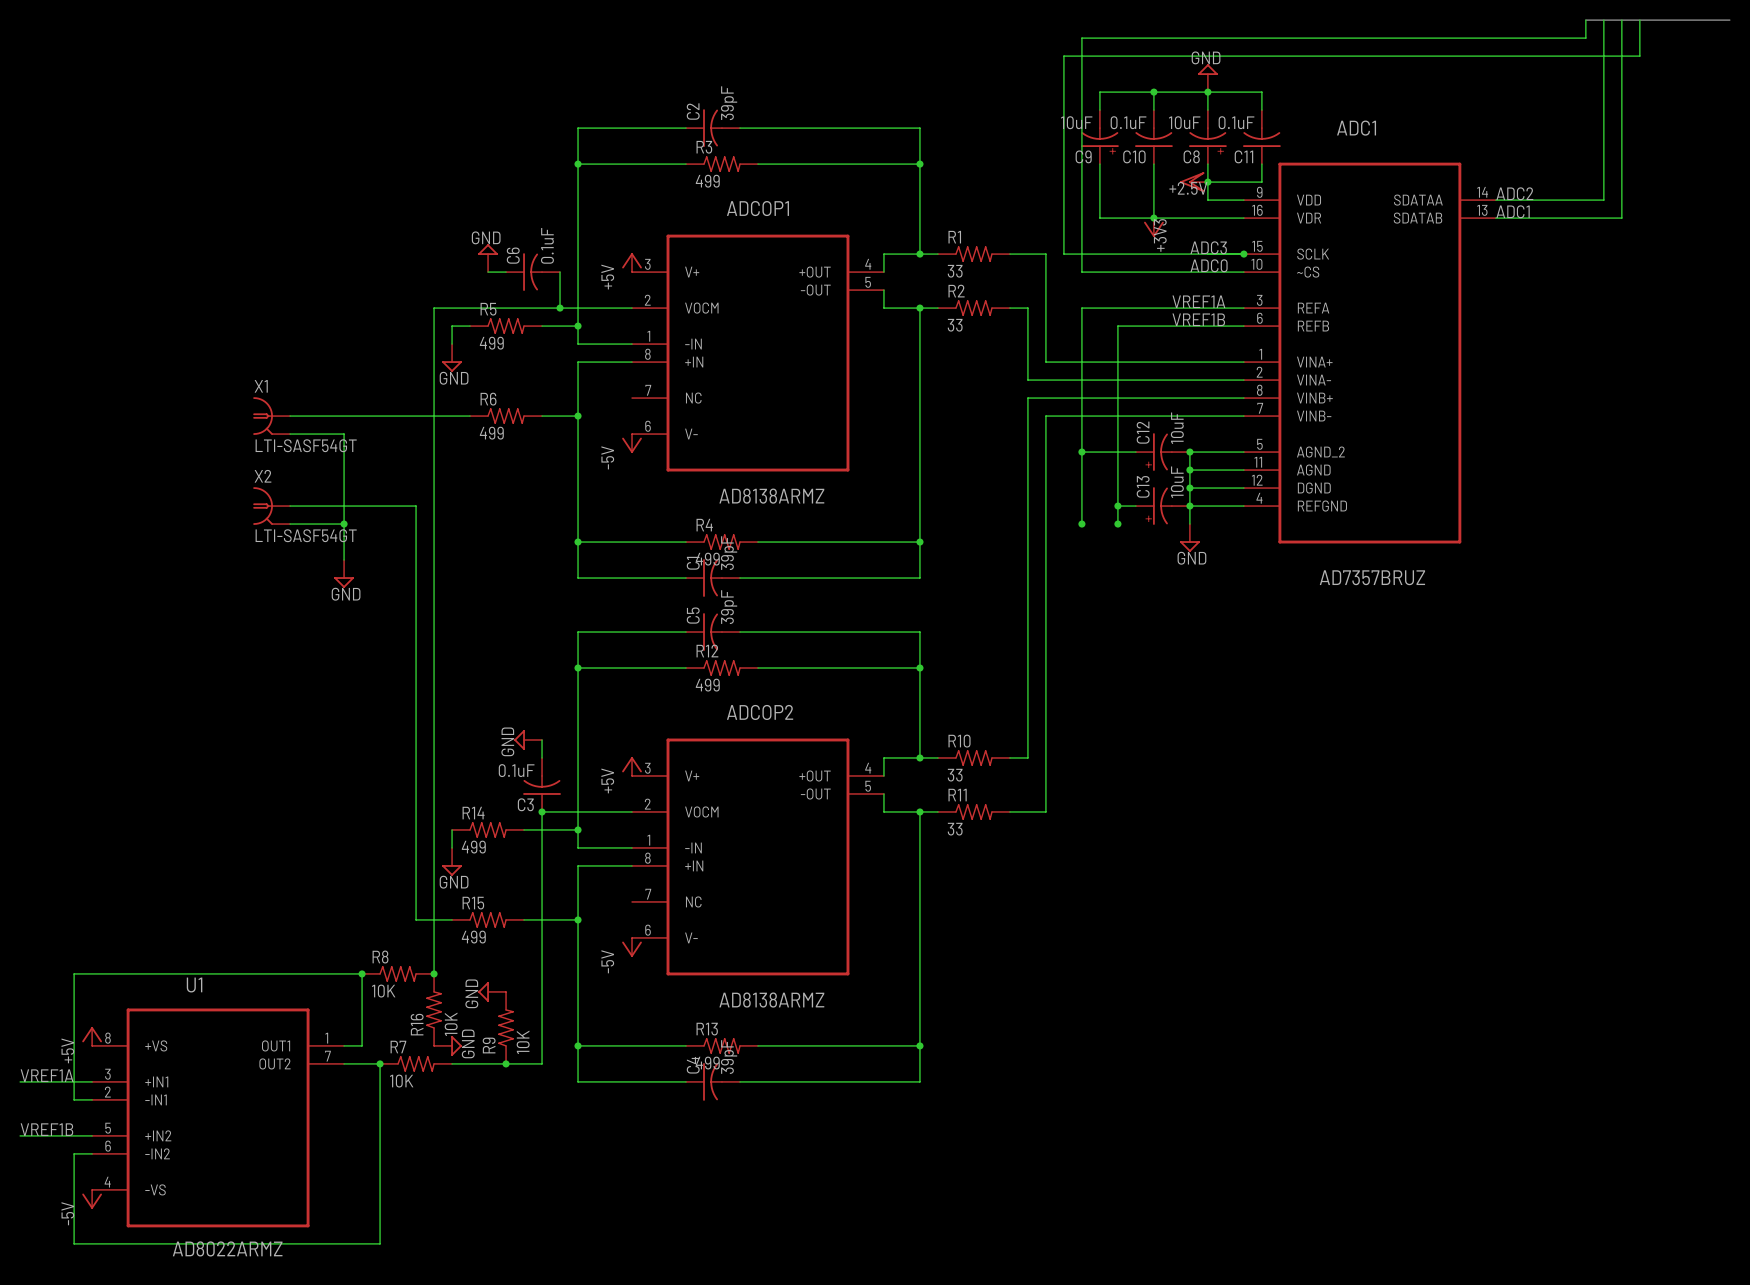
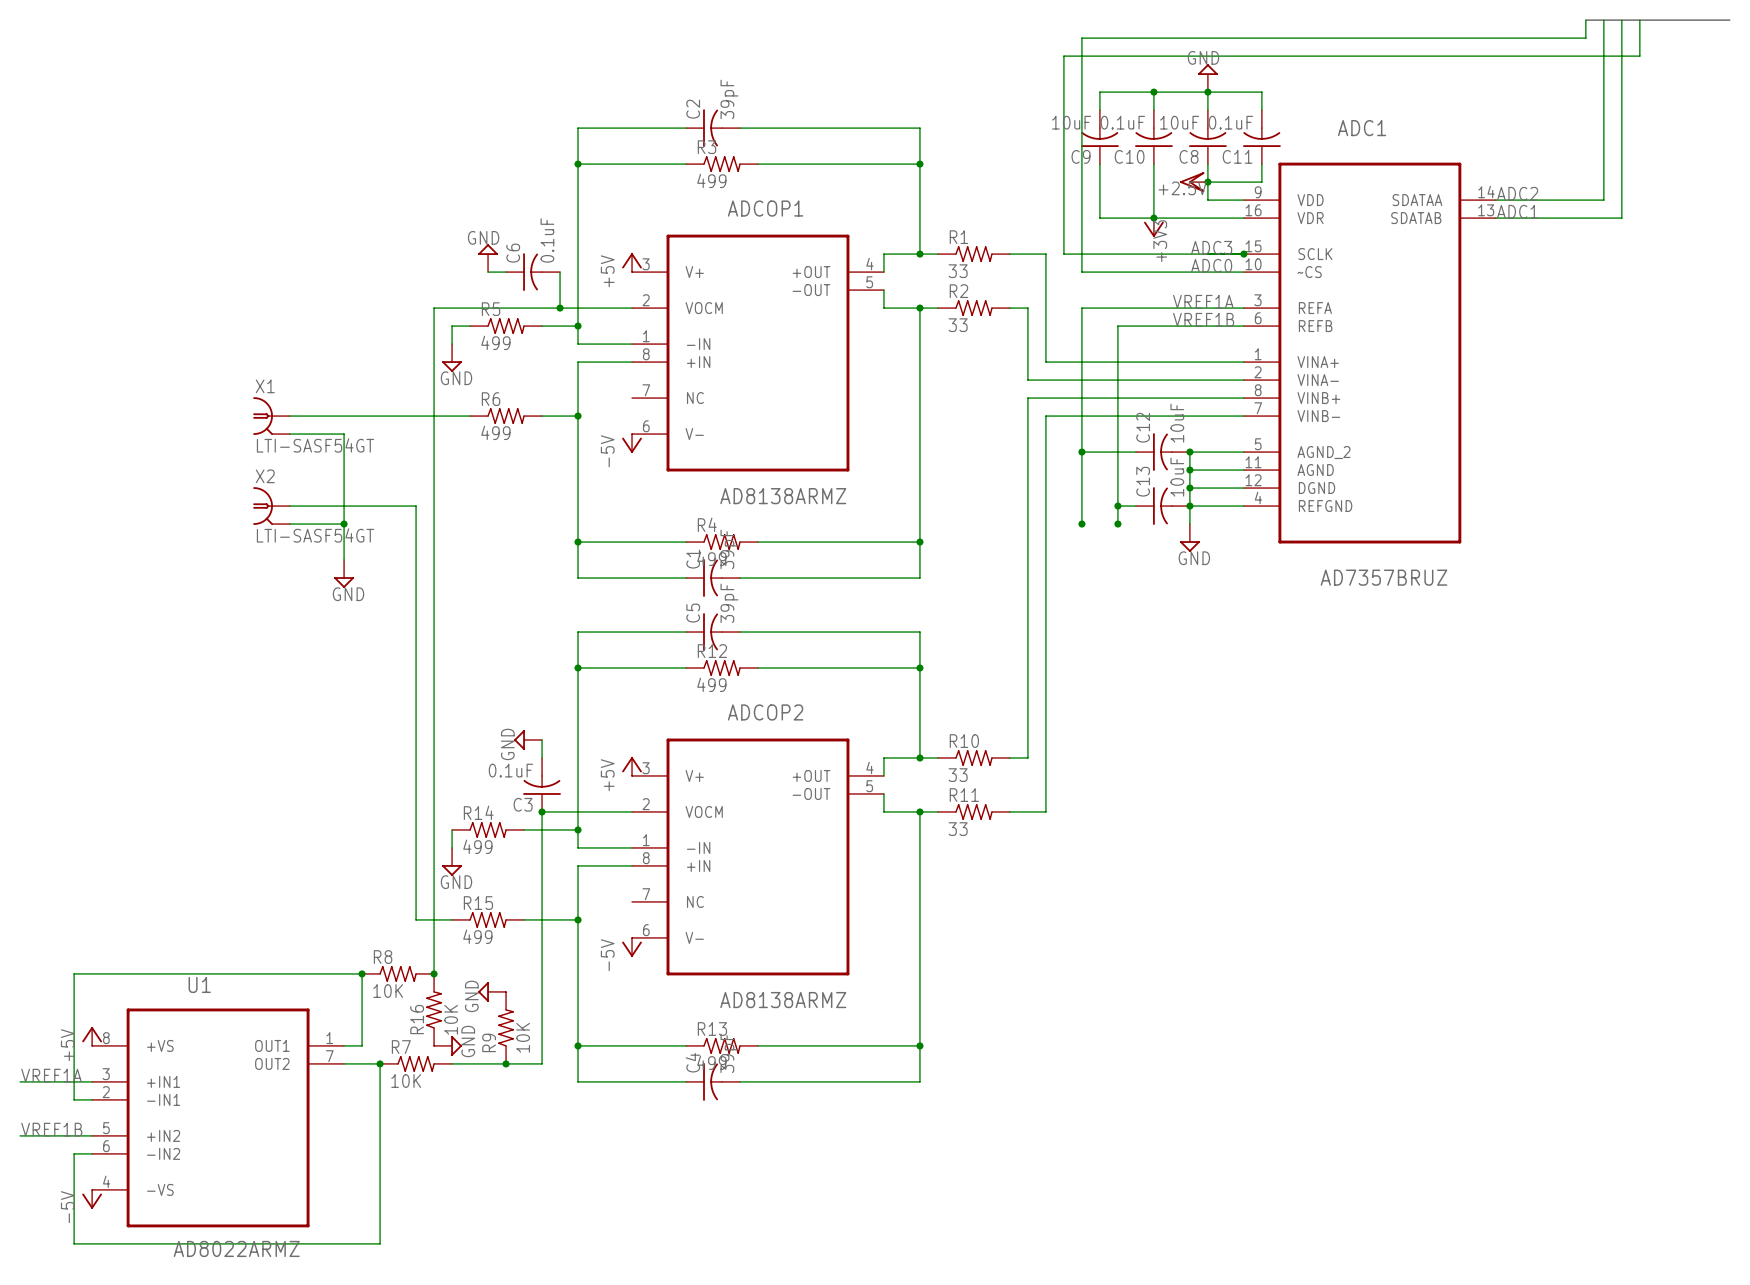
C9 symbol: [1081, 110, 1119, 165] -> [1081, 110, 1119, 165]
C8 symbol: [1189, 110, 1227, 165] -> [1189, 110, 1227, 165]
C12 symbol: [1135, 433, 1190, 471] -> [1135, 433, 1190, 471]
C13 symbol: [1135, 487, 1190, 525] -> [1135, 487, 1190, 525]

